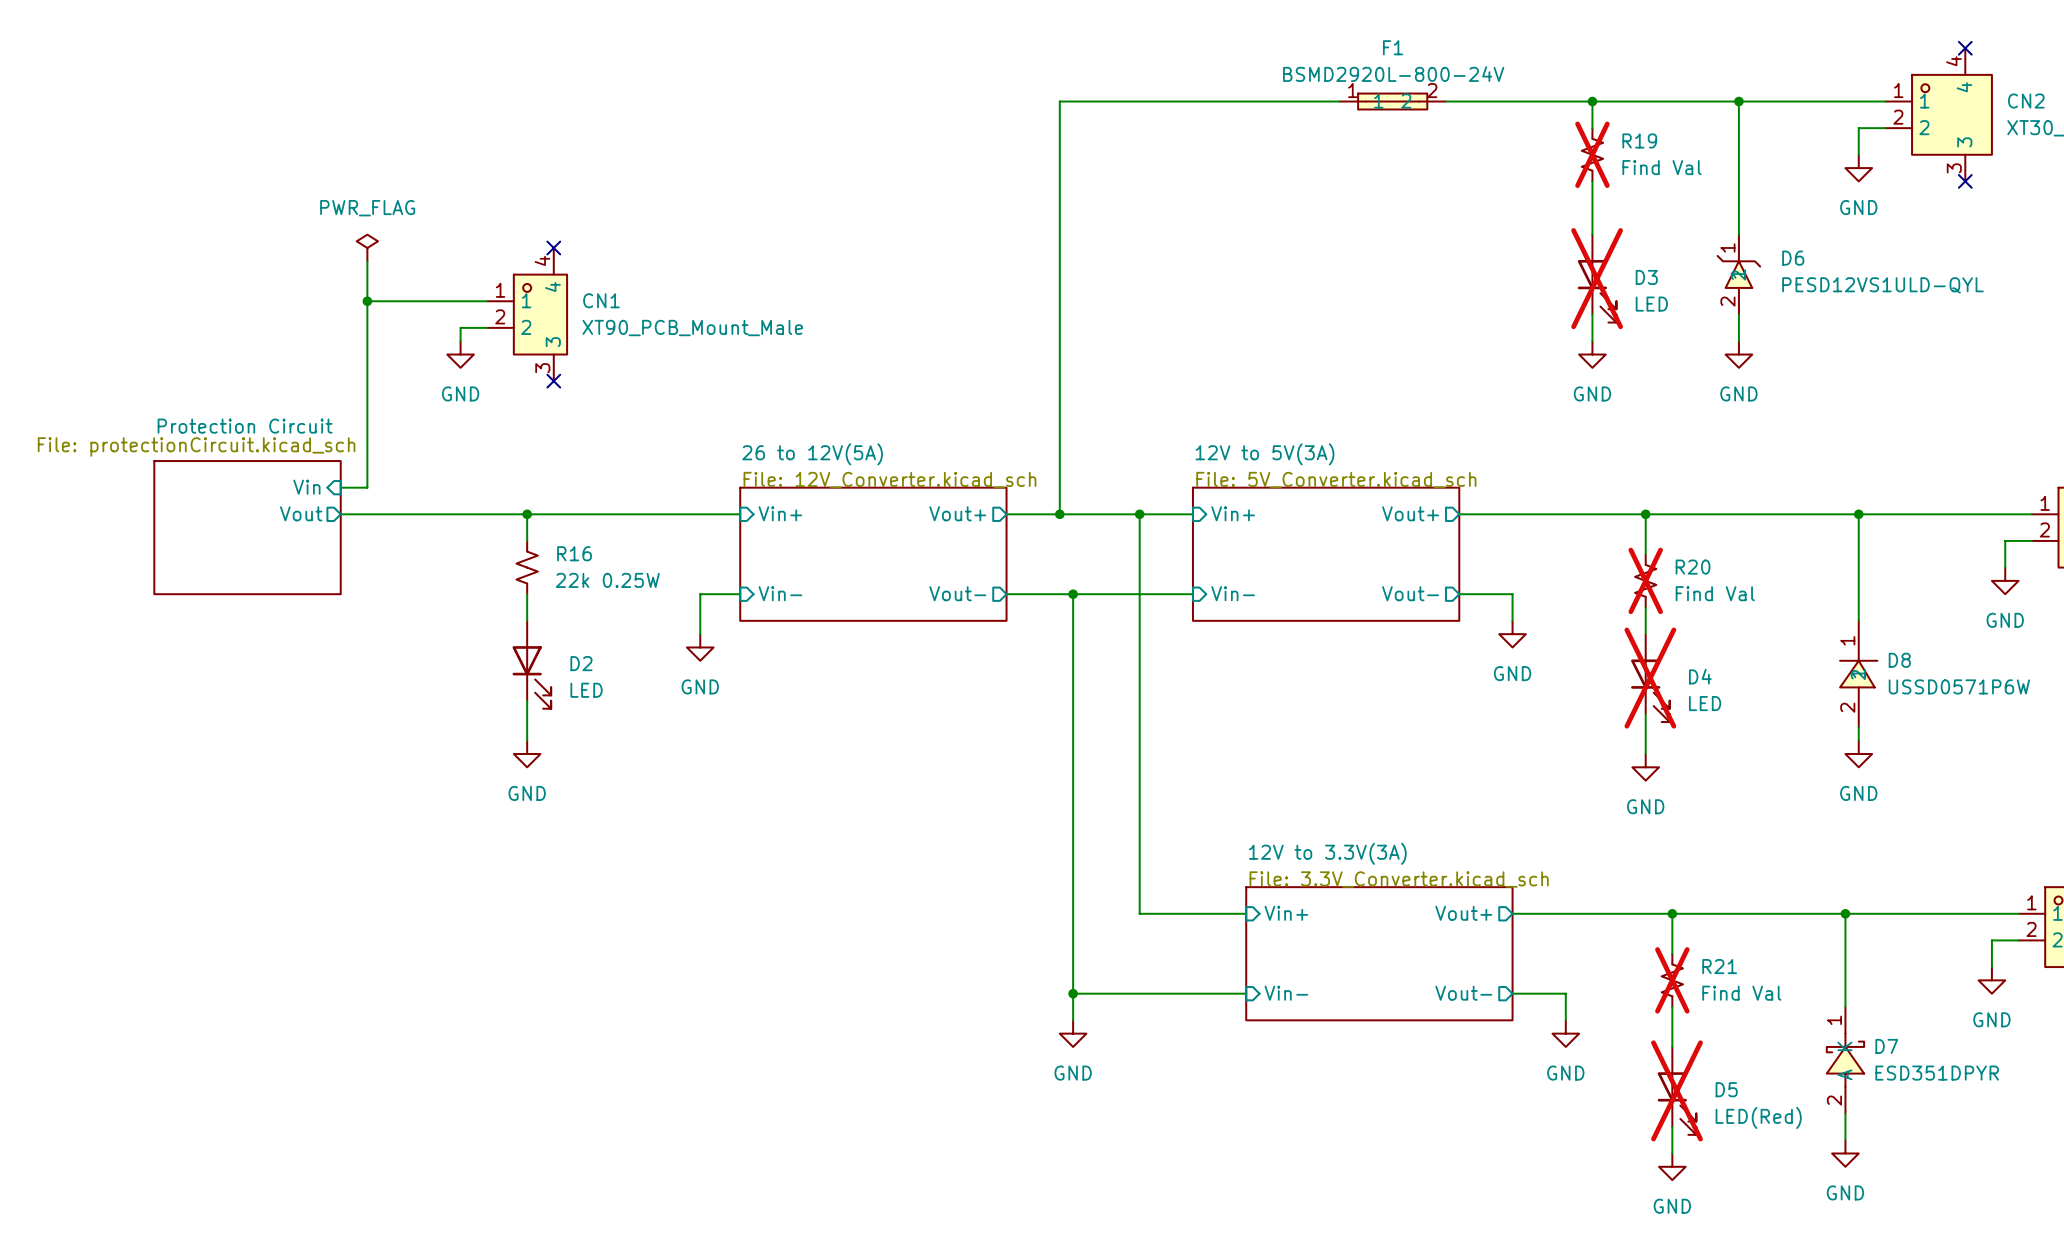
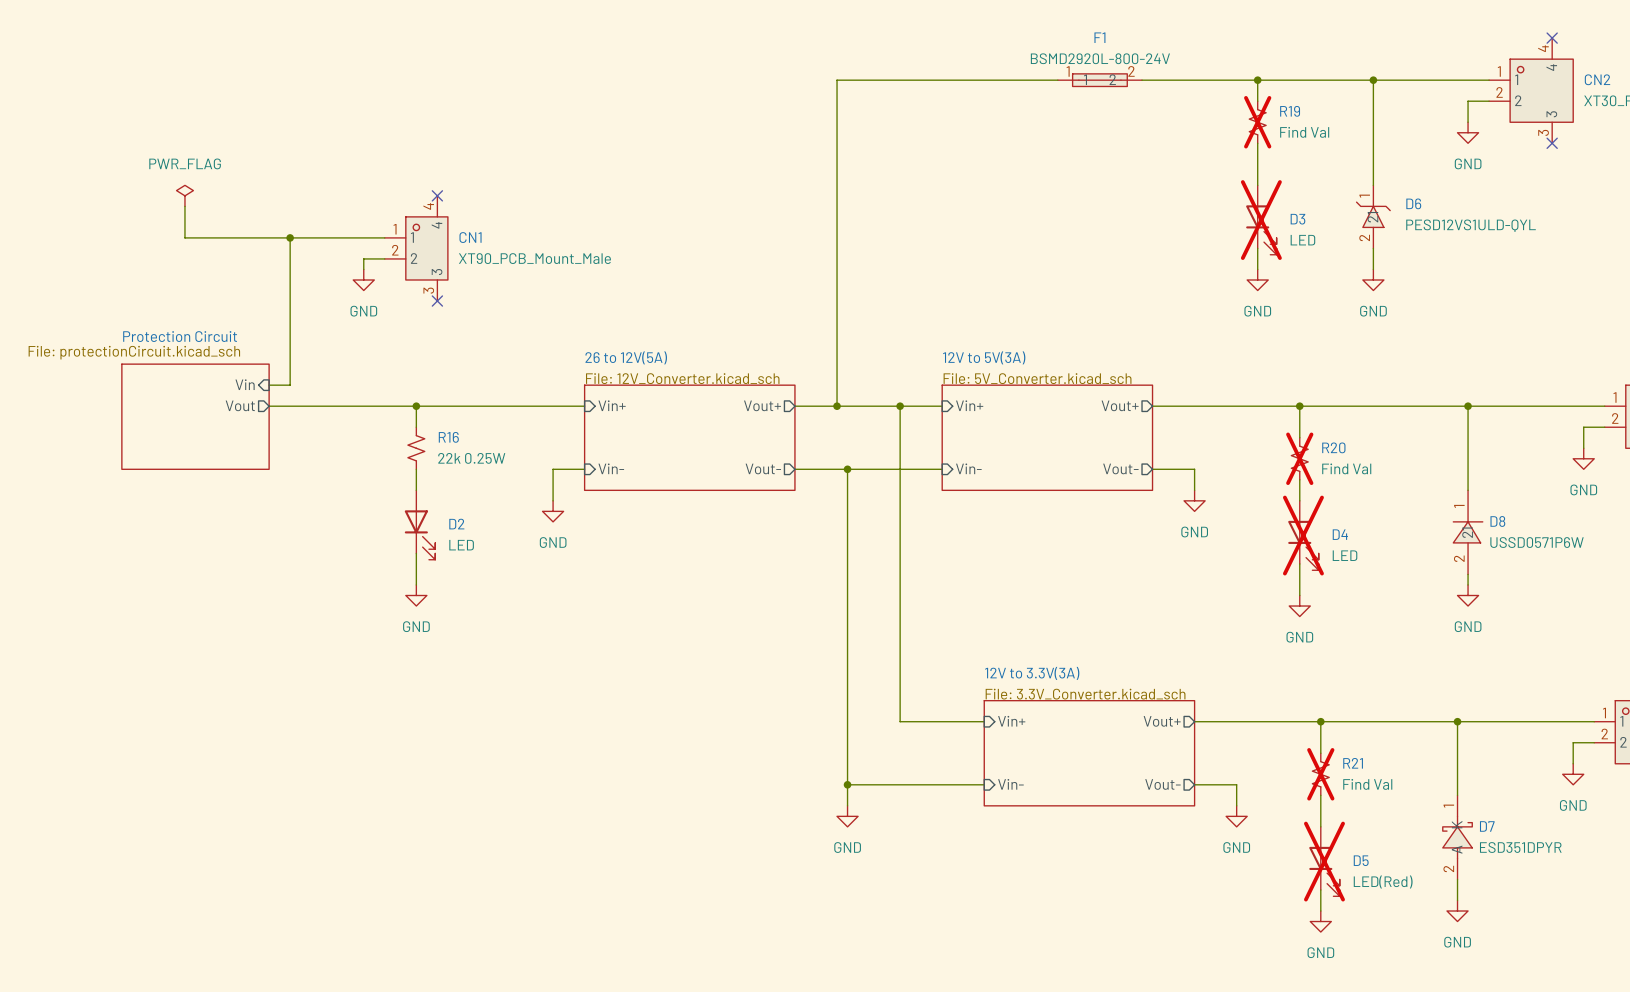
power symbol position: PWR_FLAG (367, 247) -> PWR_FLAG (184, 195)
wire: (367, 261) (367, 301) -> (184, 206) (184, 237) (290, 237)

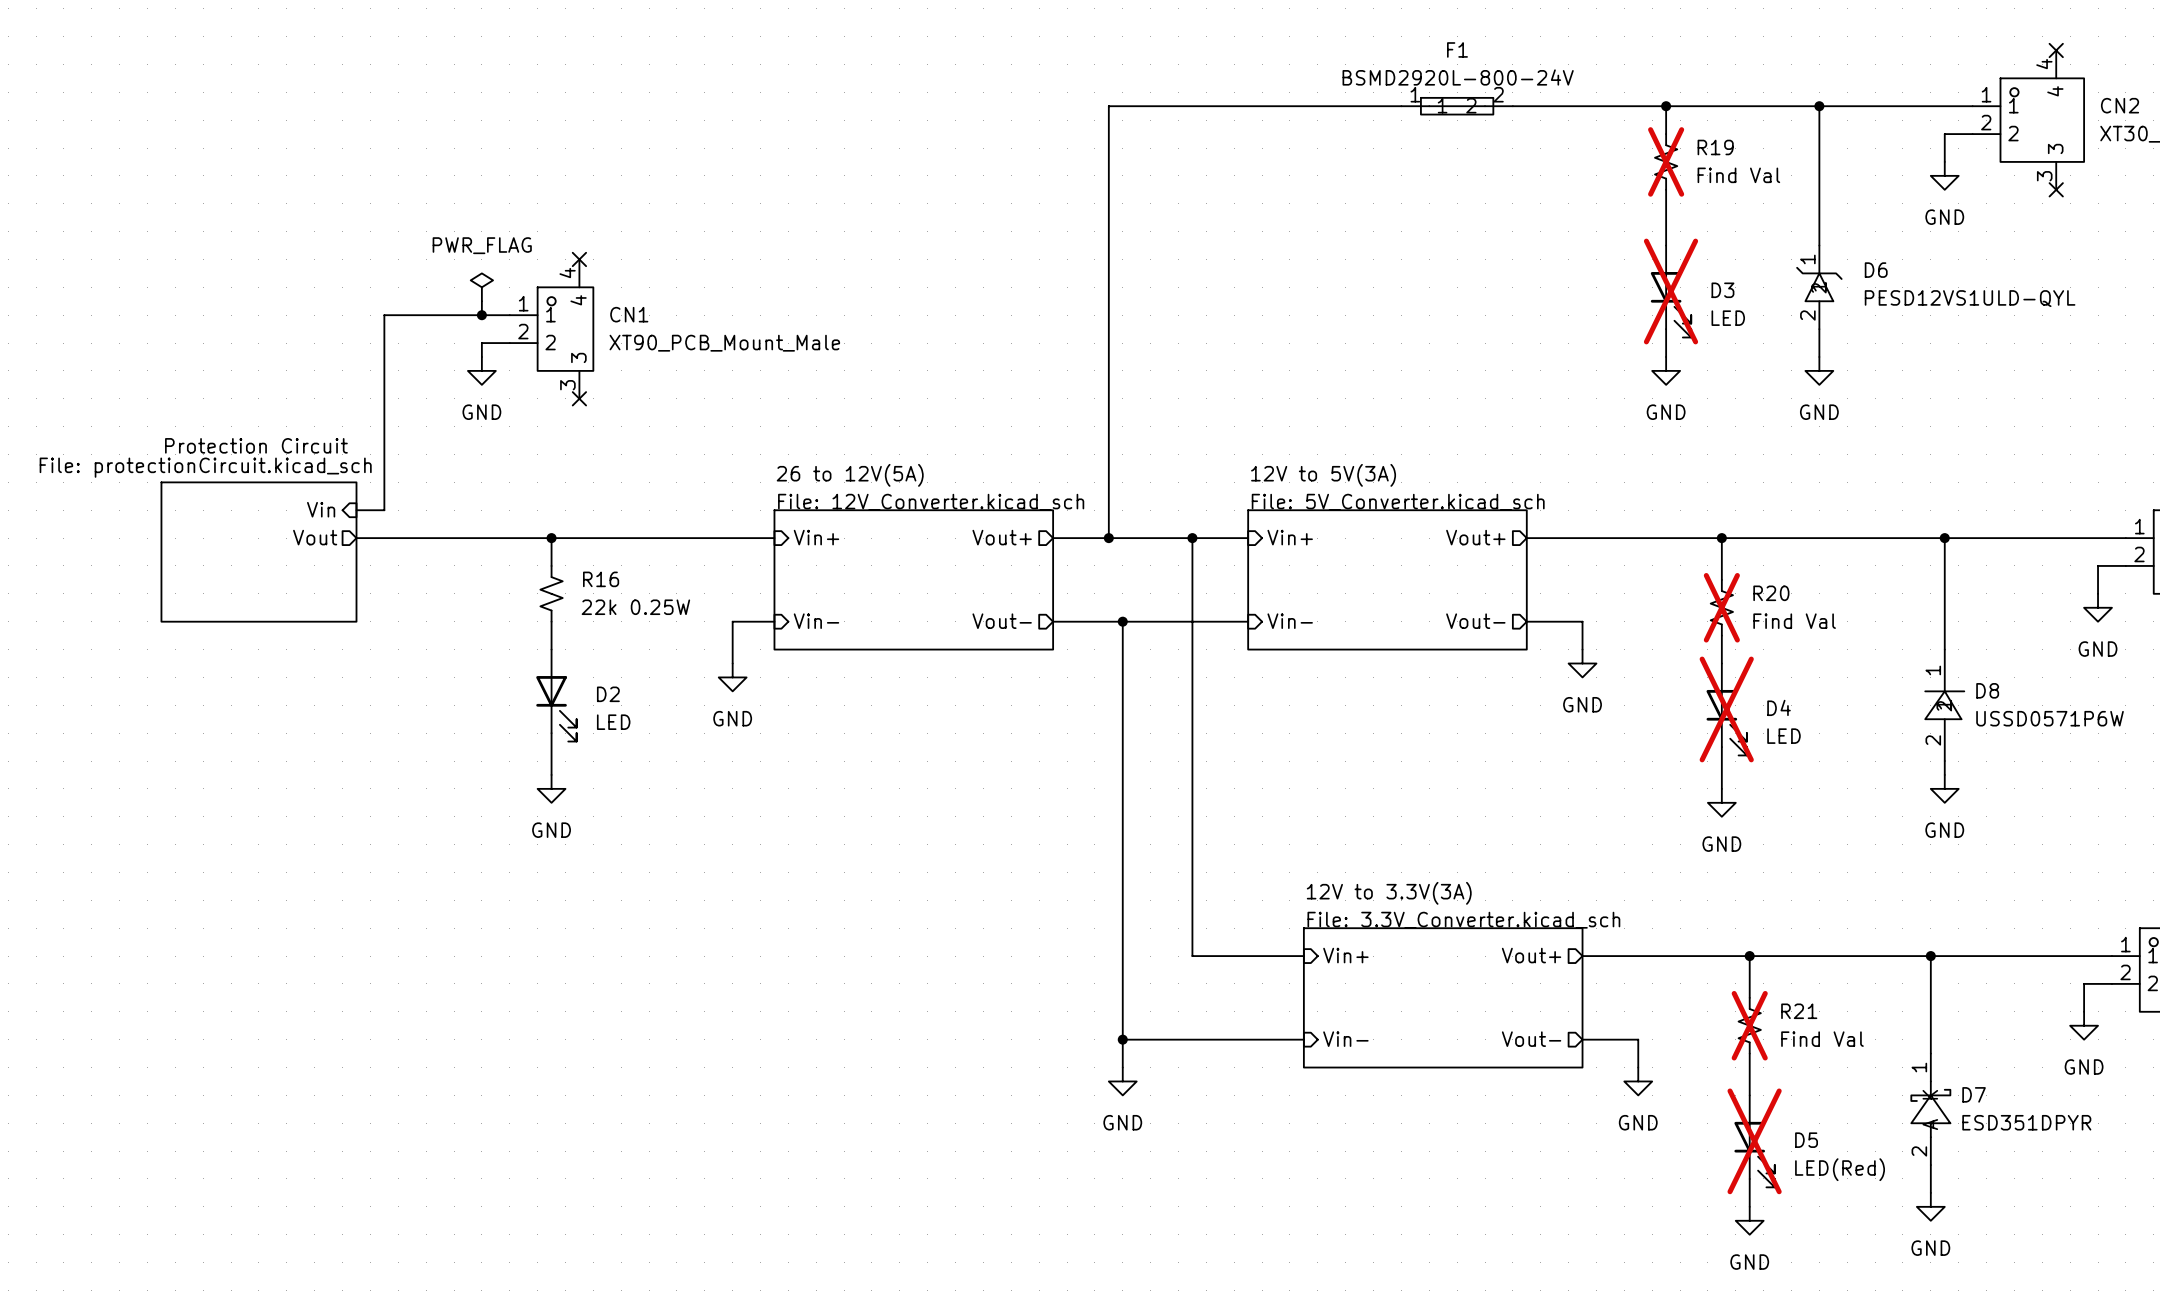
power symbol position: PWR_FLAG (184, 195) -> PWR_FLAG (481, 287)
wire: (184, 206) (184, 237) (290, 237) -> none
wire: none -> (481, 301) (481, 315)
junction: (290, 237) -> none
junction: none -> (481, 315)

